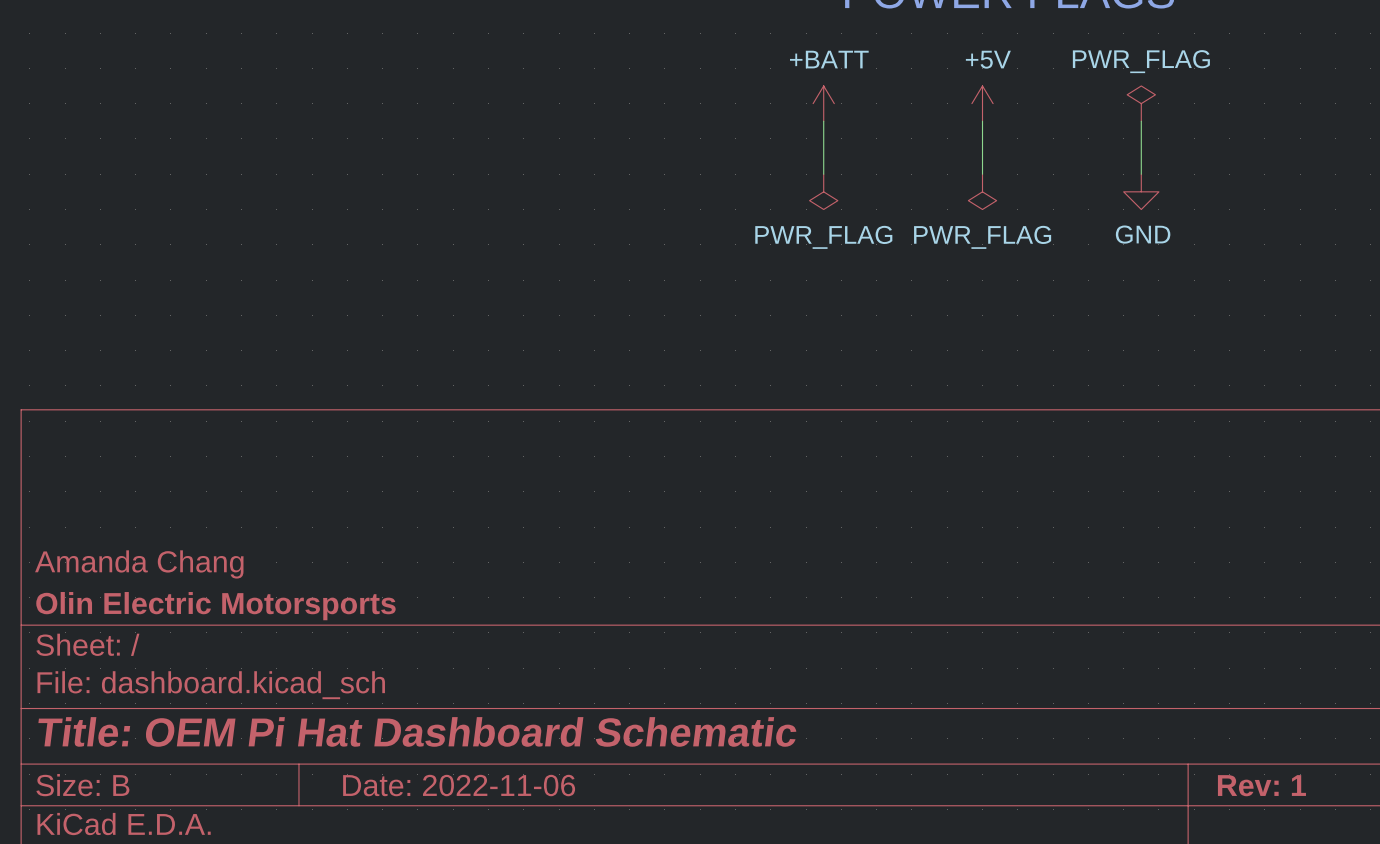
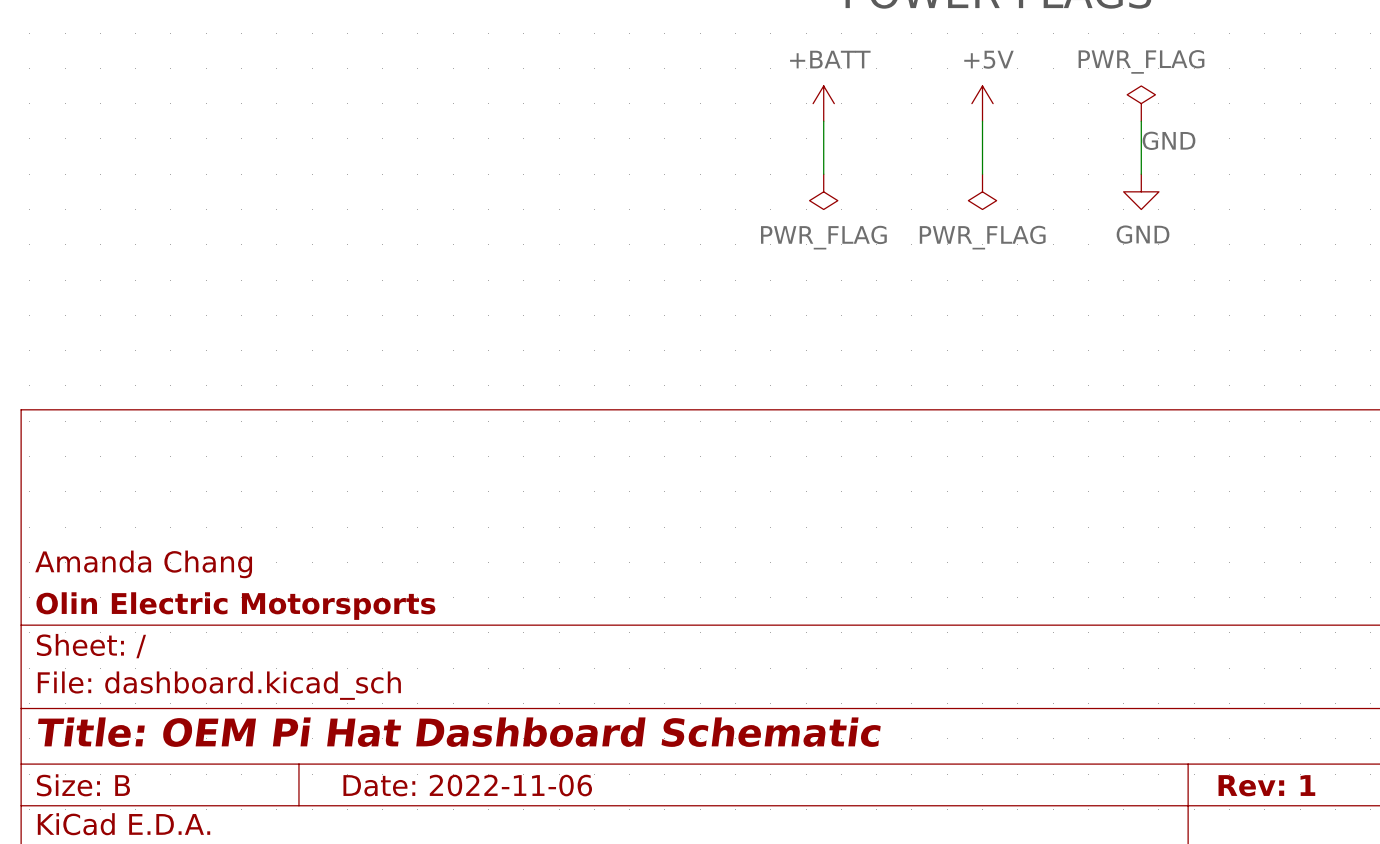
label: none -> GND (1169, 140)

